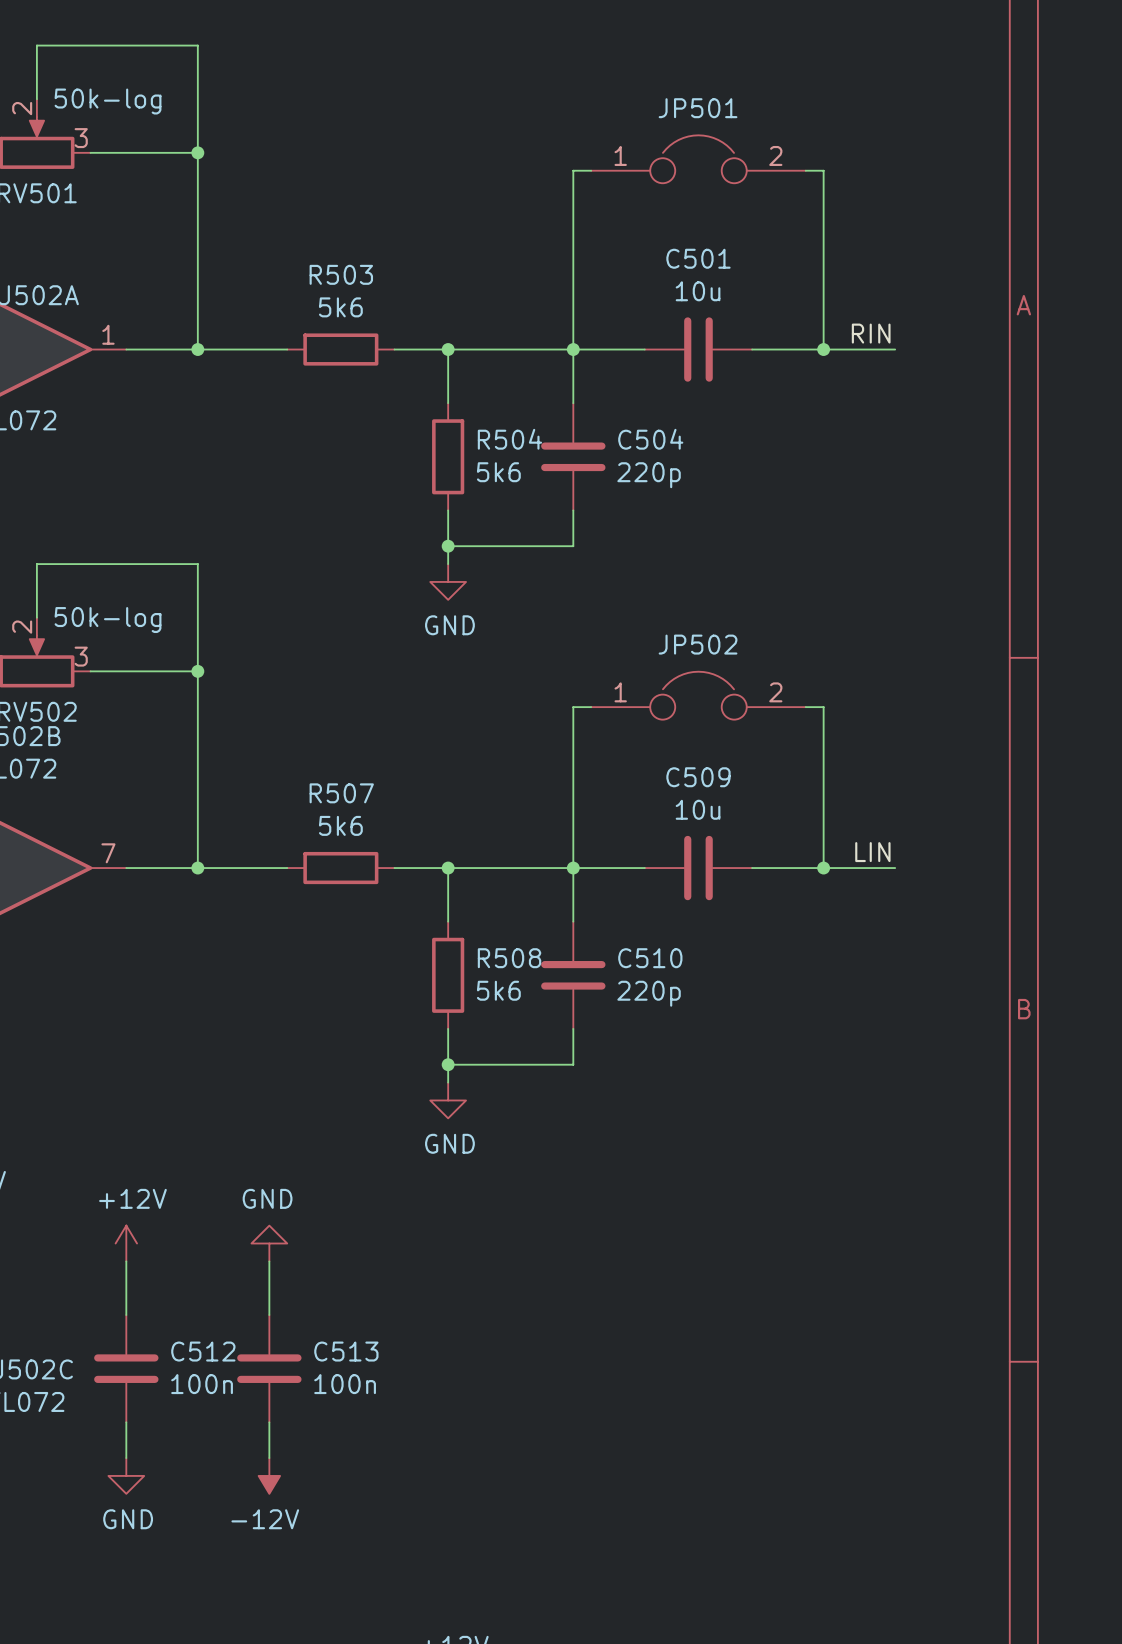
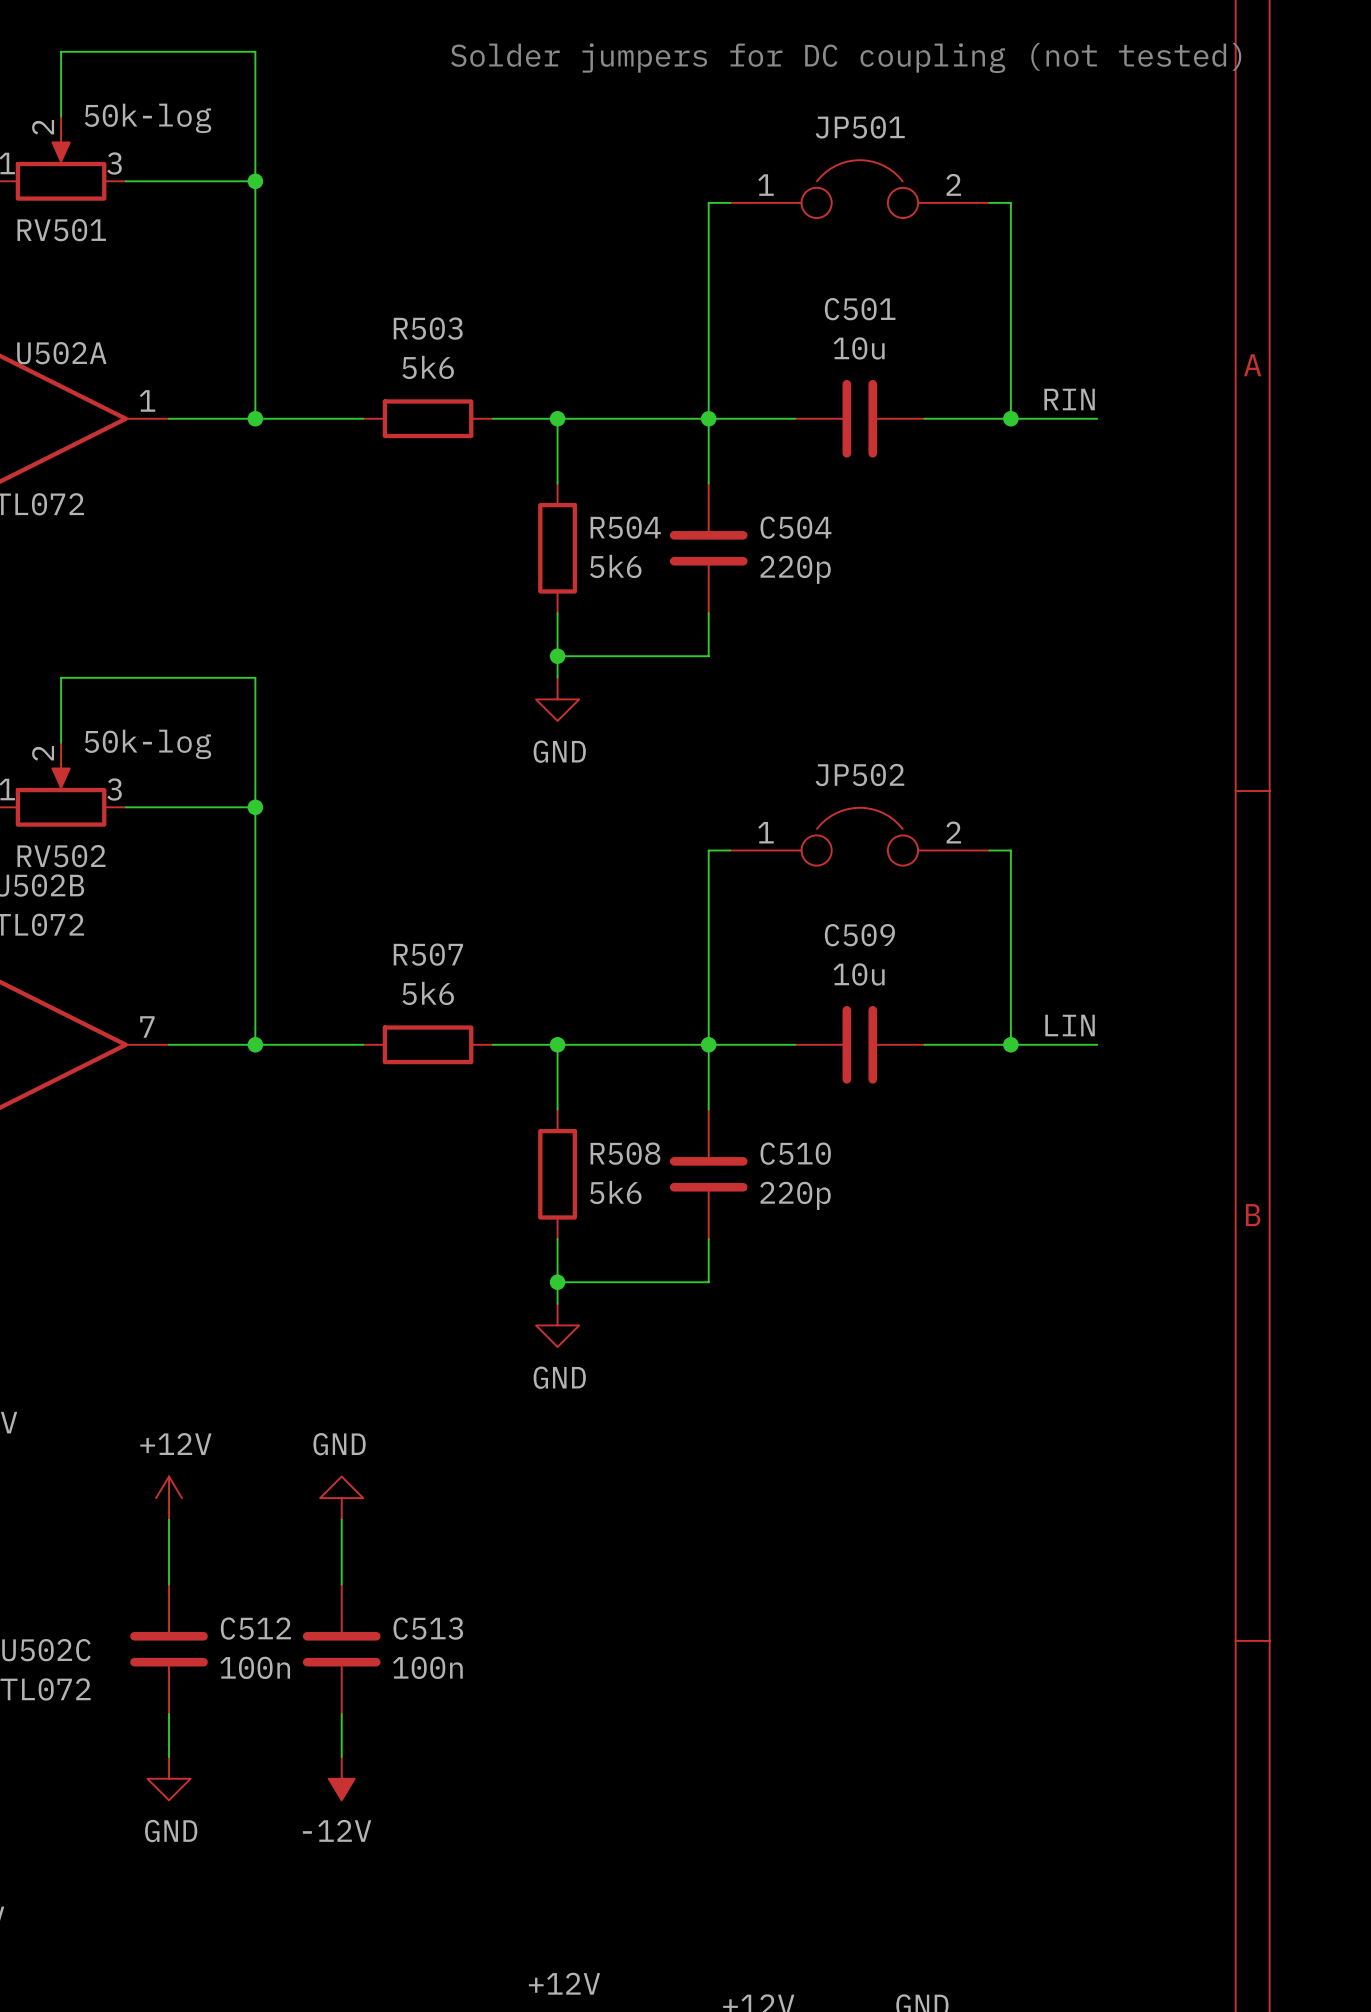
text: none -> Solder jumpers for DC coupling (not tested) (846, 58)

